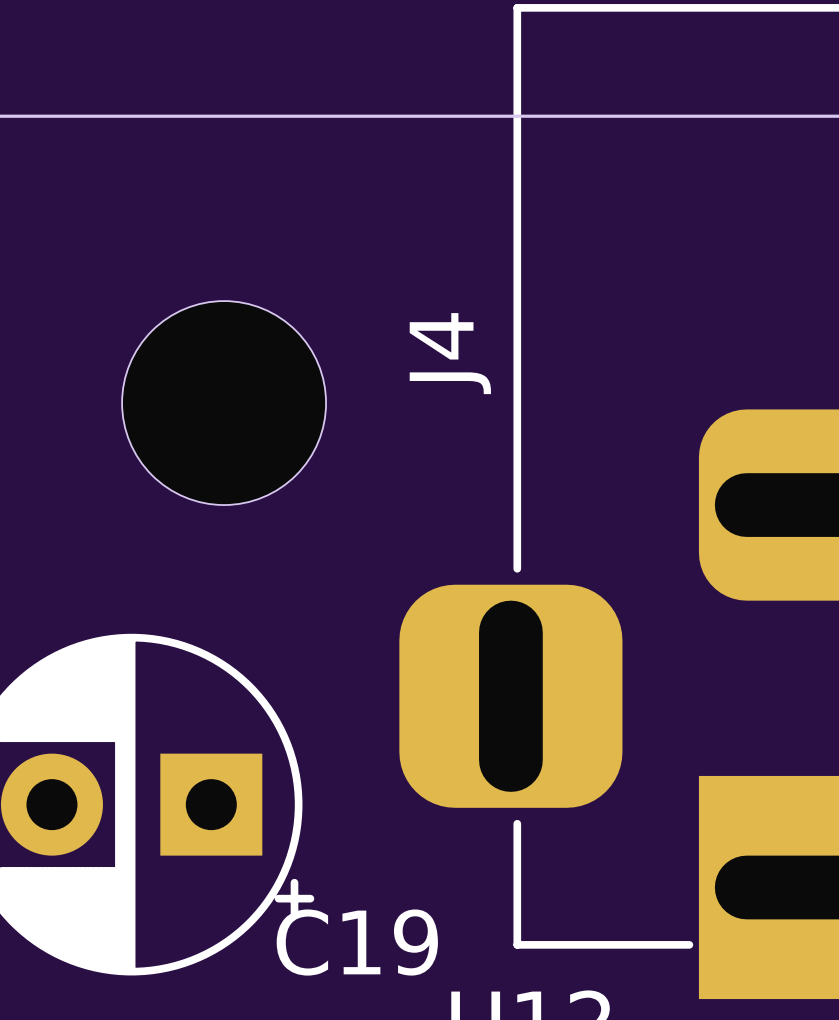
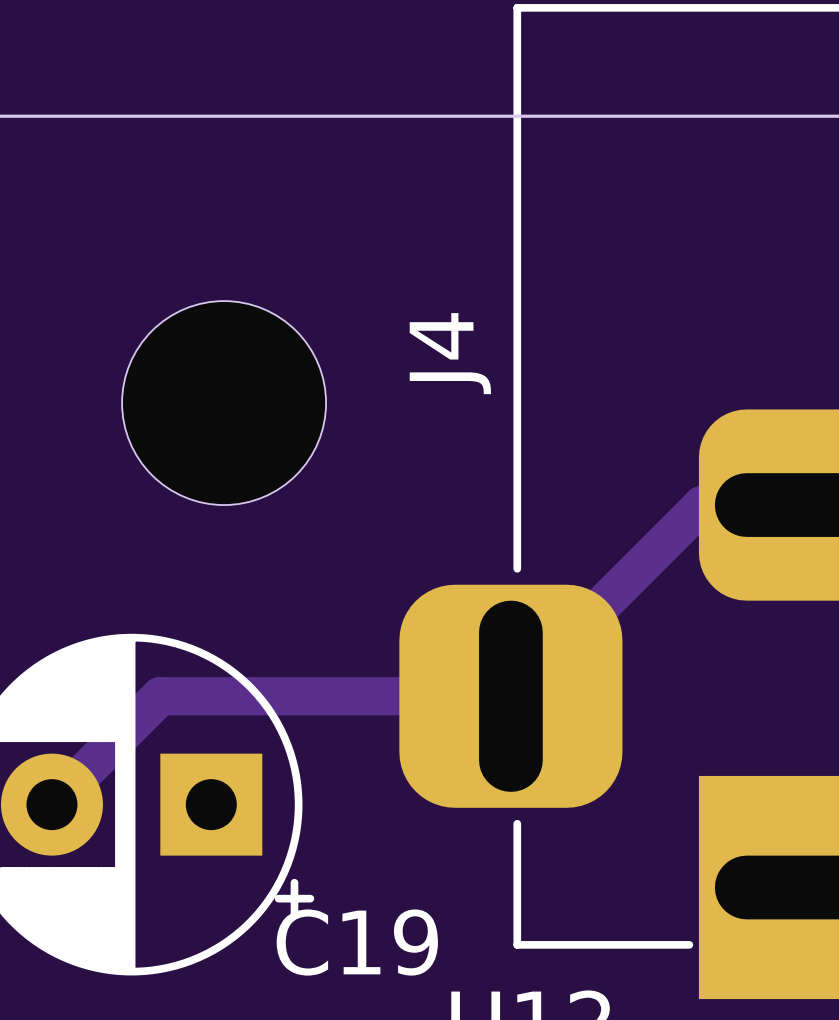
track: none -> (810, 505) (702, 505) (510, 696) (160, 696) (51, 804)

